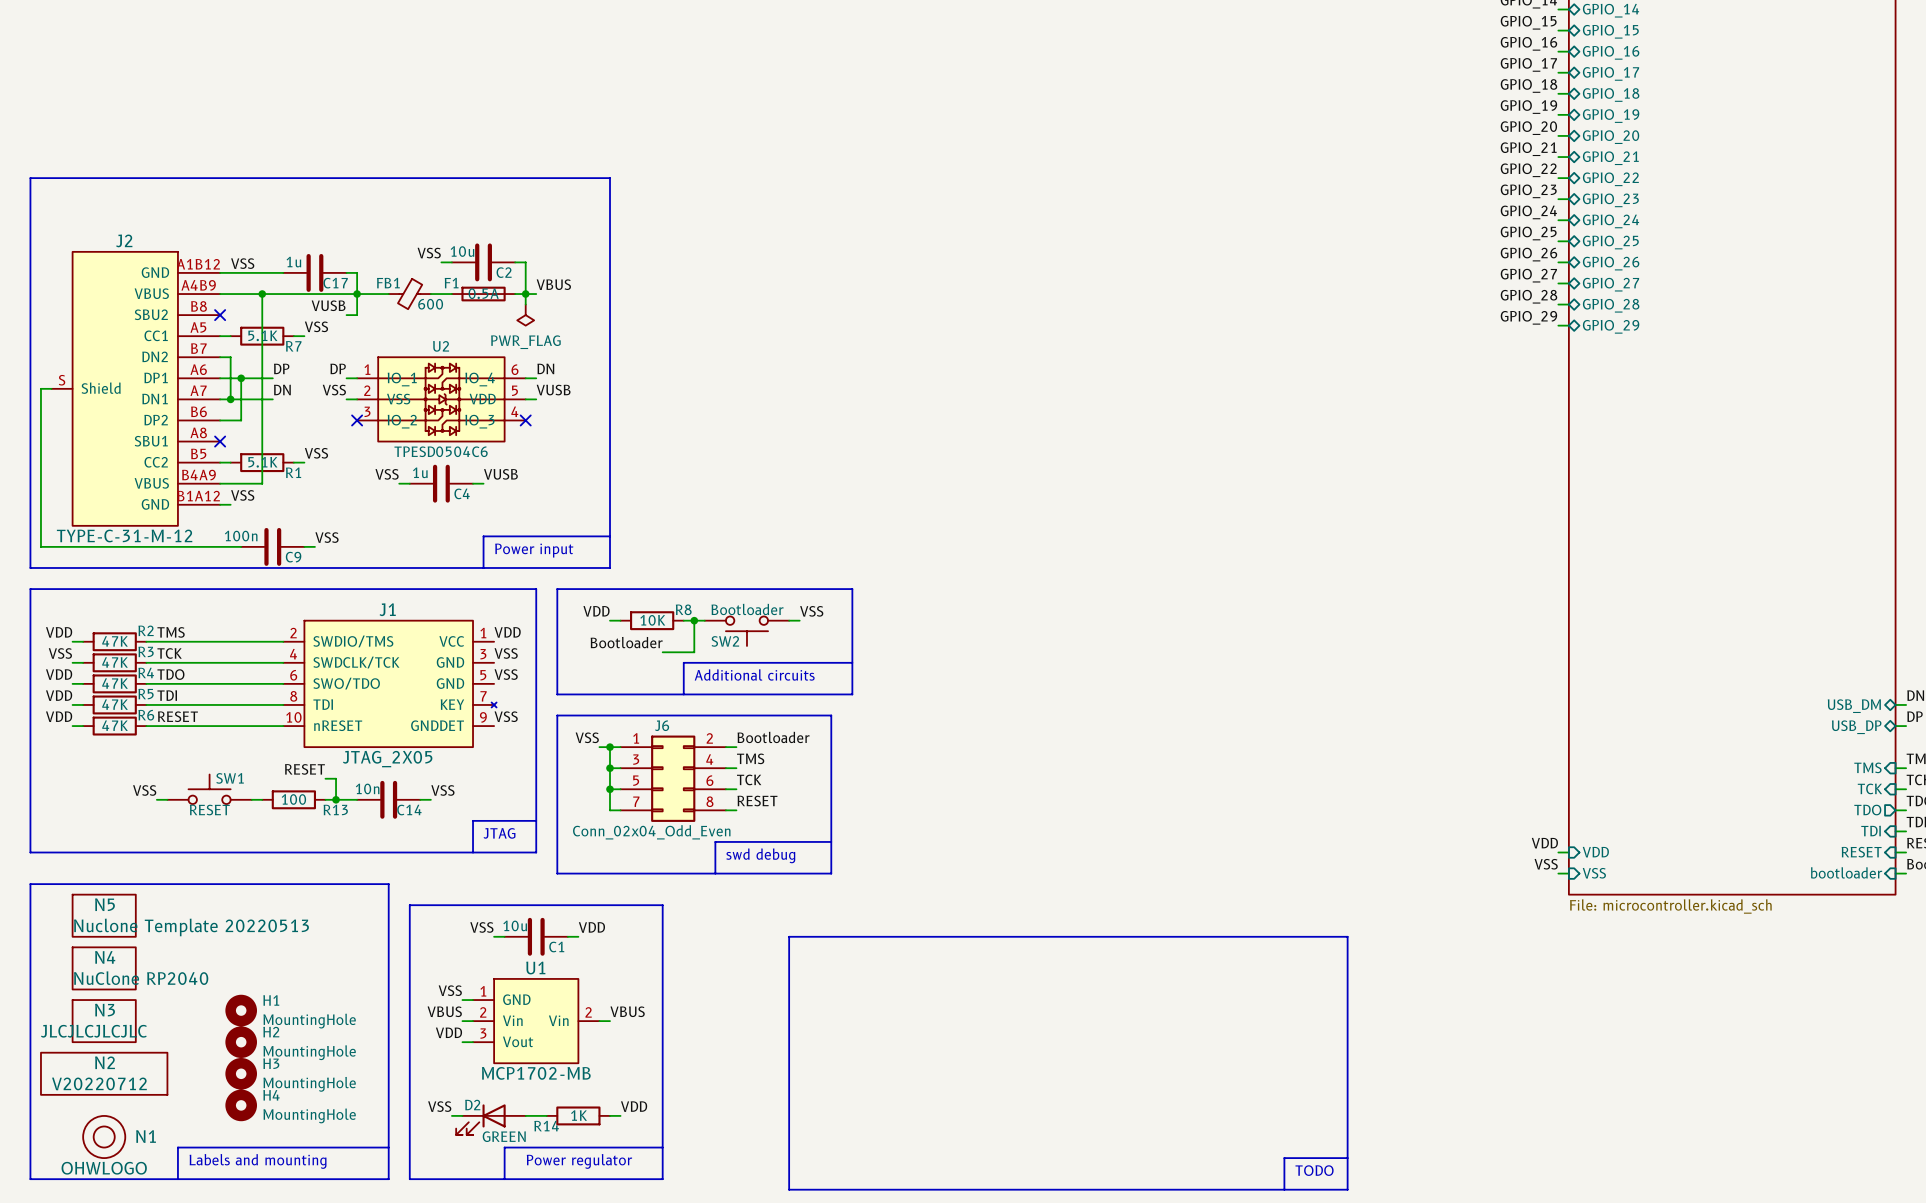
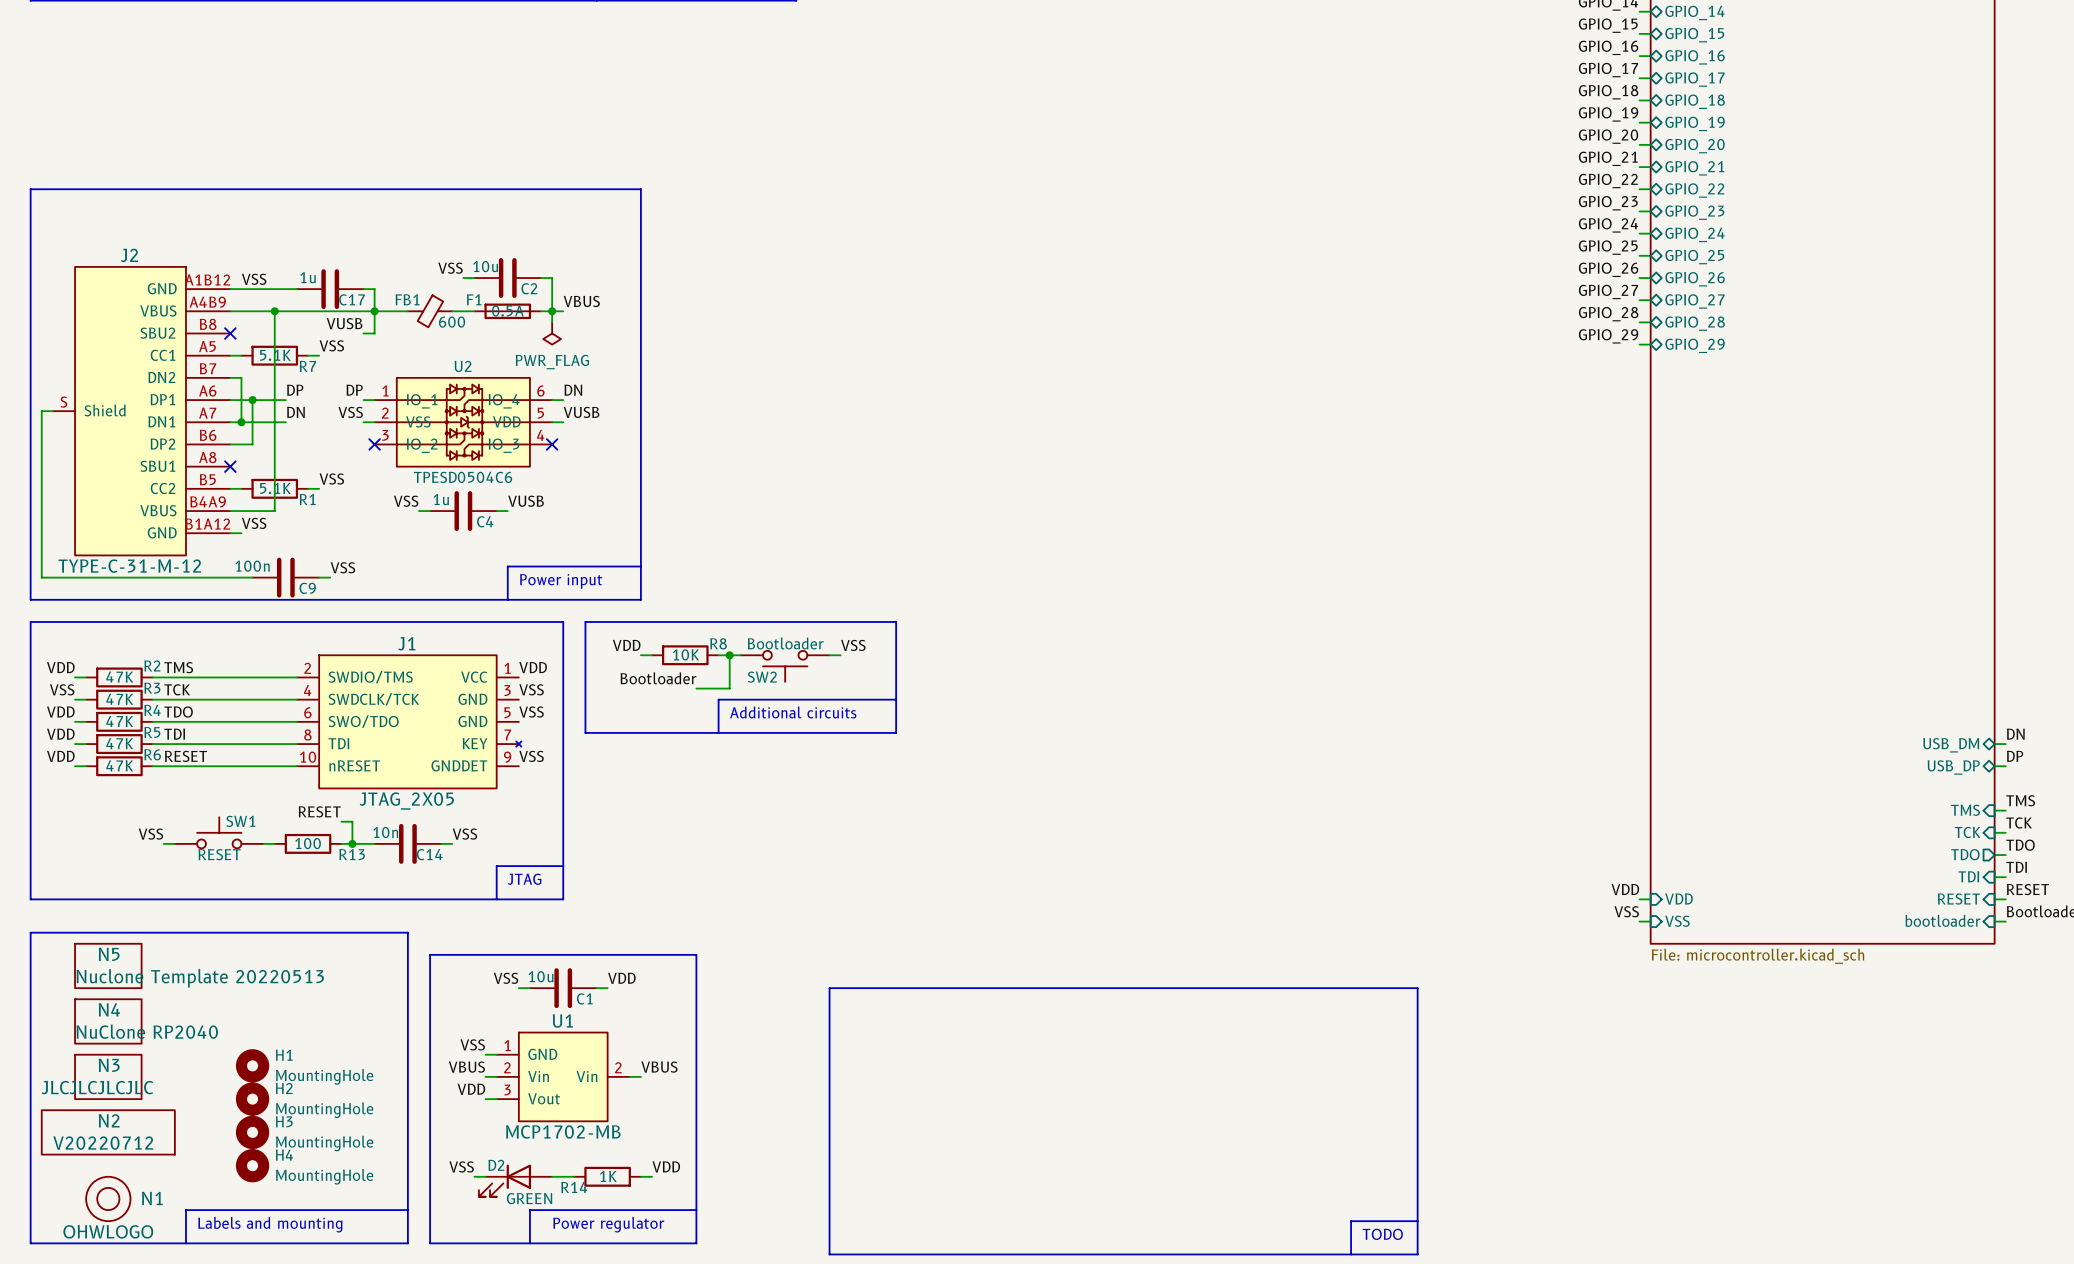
line: (557, 715) (557, 873) (831, 873) (831, 715) (557, 715) -> none
label: VSS (587, 737) -> none
label: Bootloader (773, 737) -> none
wire: (599, 747) (620, 747) -> none
wire: (610, 747) (610, 810) (620, 810) -> none
junction: (610, 747) -> none
wire: (725, 747) (736, 747) -> none
label: TMS (750, 758) -> none
wire: (610, 768) (620, 768) -> none
junction: (610, 768) -> none
wire: (725, 768) (736, 768) -> none
J6: Conn_02x04_Odd_Even (673, 778) -> none
label: TCK (749, 779) -> none
wire: (610, 789) (620, 789) -> none
junction: (610, 789) -> none
wire: (725, 789) (736, 789) -> none
label: RESET (757, 801) -> none
wire: (725, 810) (736, 810) -> none
line: (831, 841) (715, 841) (715, 873) -> none
text: swd debug (760, 855) -> none

